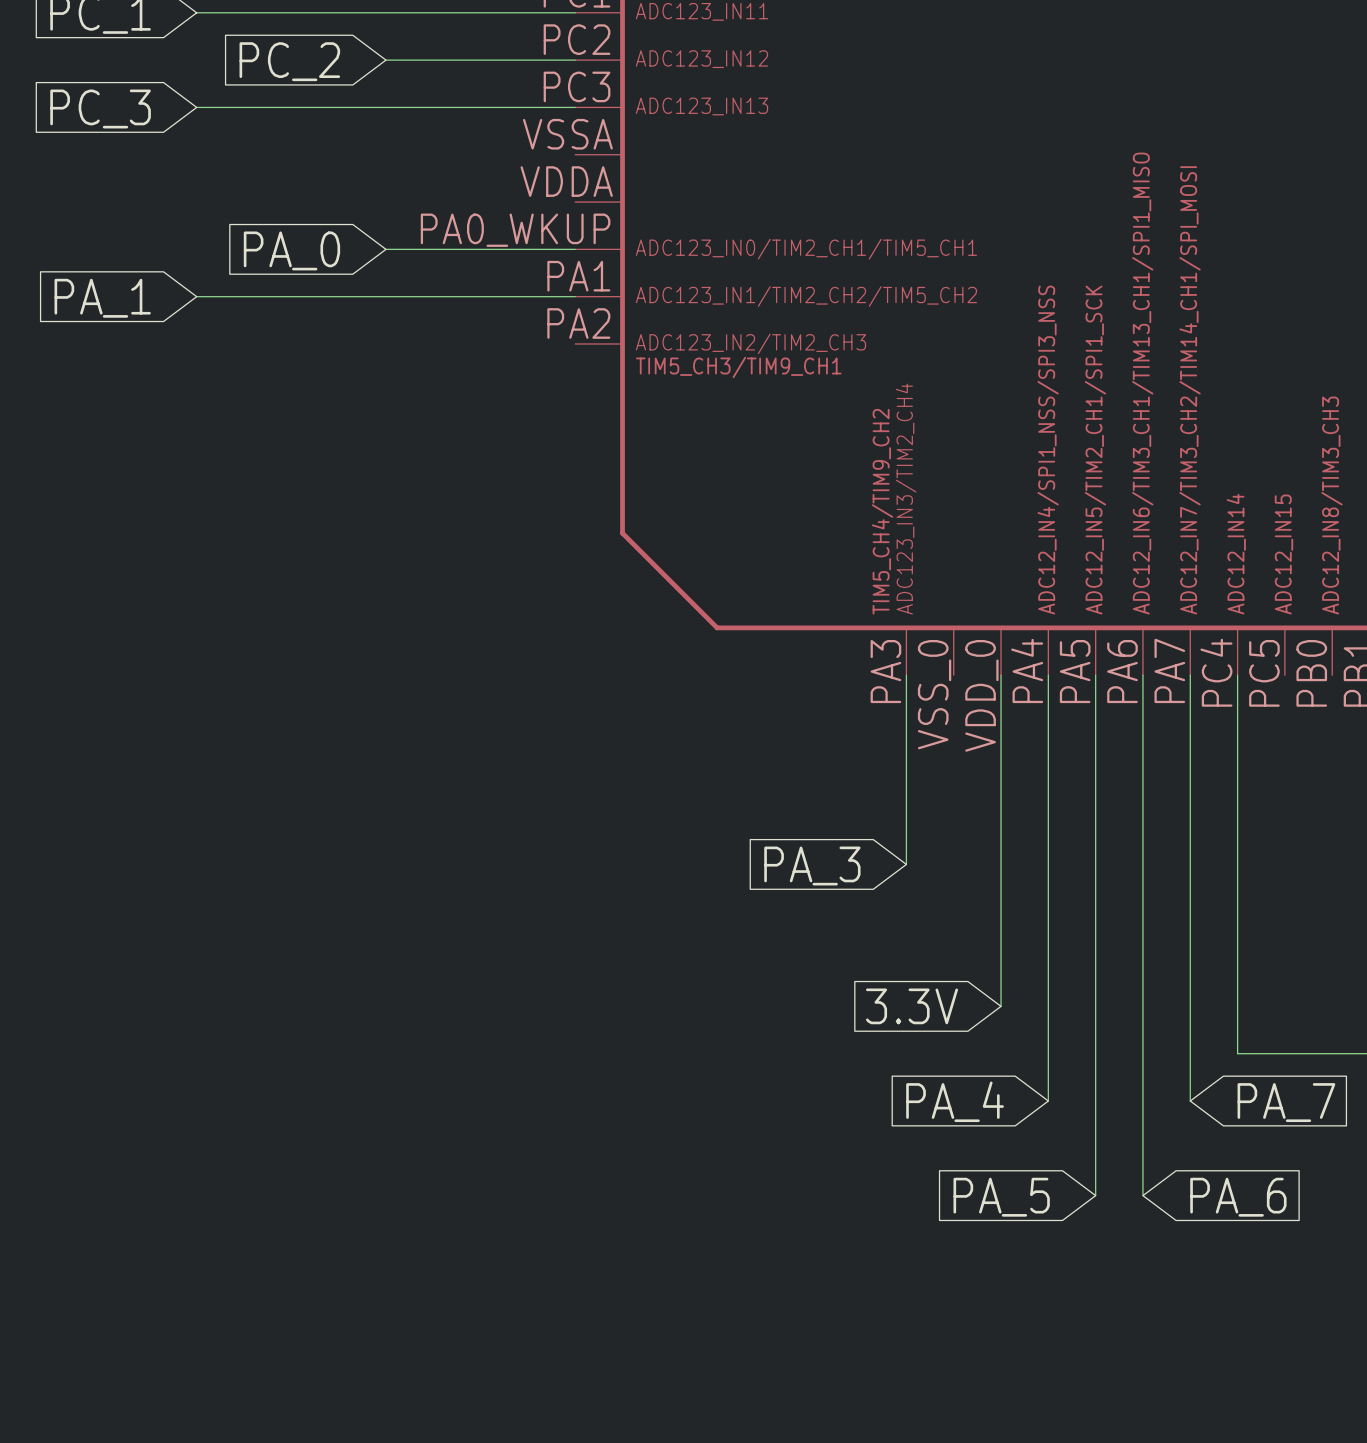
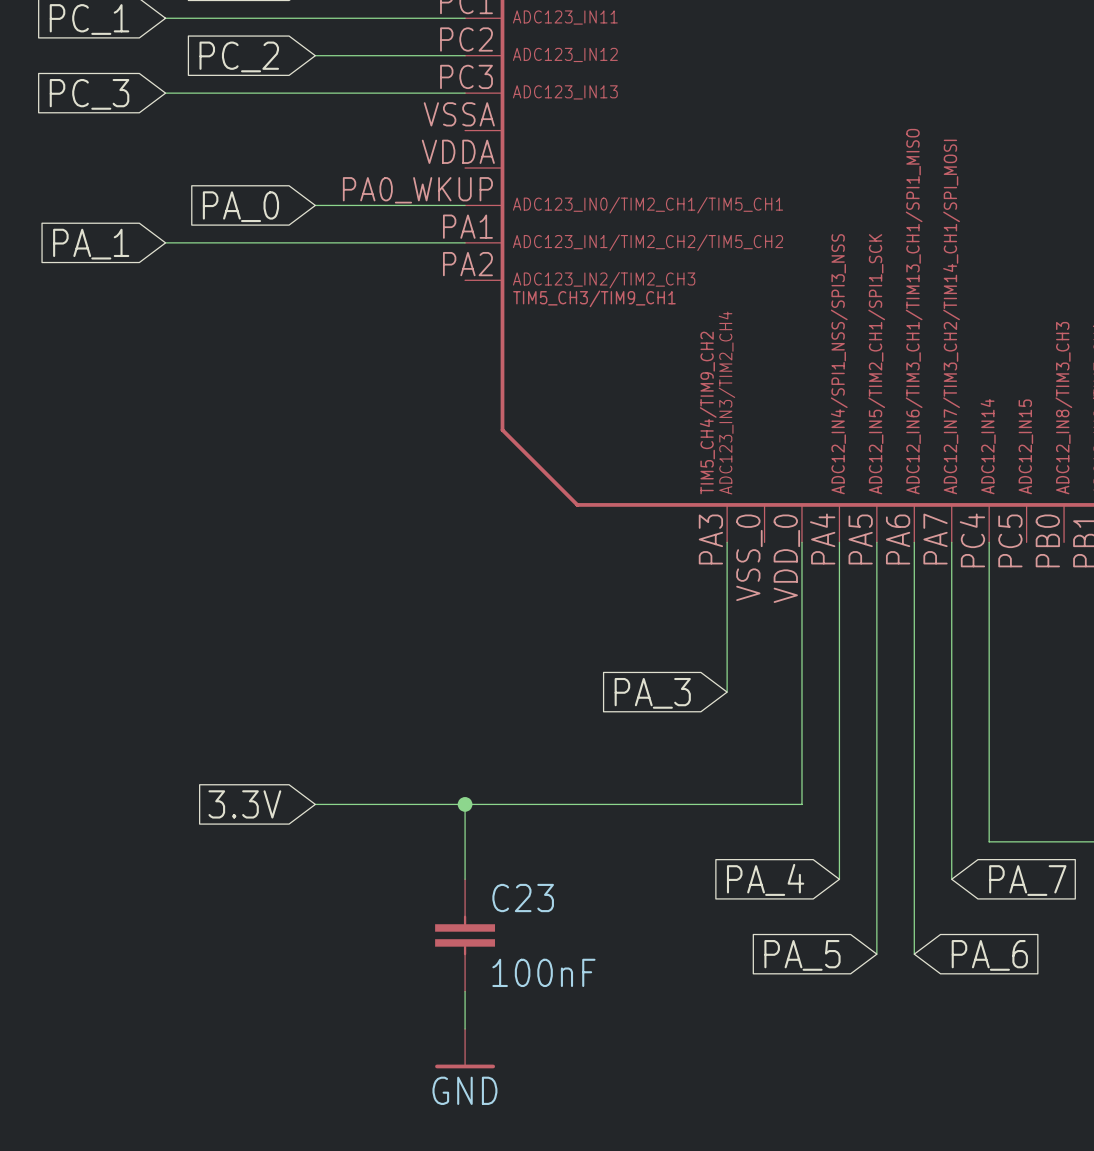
global label: none -> 3.3V (244, 804)
wire: none -> (315, 804) (801, 804)
wire: none -> (465, 804) (465, 879)
junction: none -> (465, 804)
global label: 3.3V (911, 1006) -> none
C23: none -> 100nF (465, 935)
wire: none -> (465, 991) (465, 1029)
power symbol: none -> GND (465, 1048)

